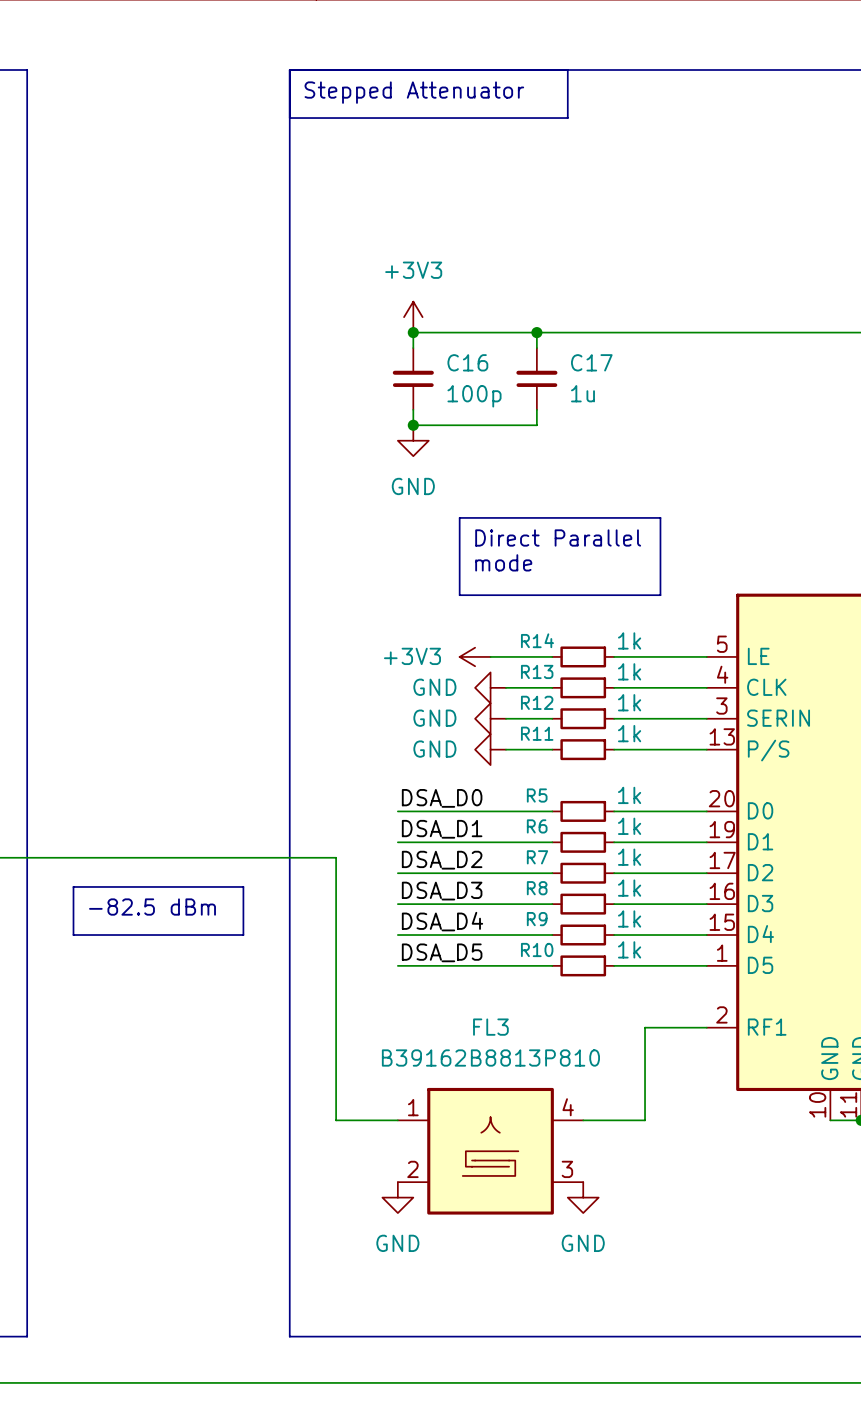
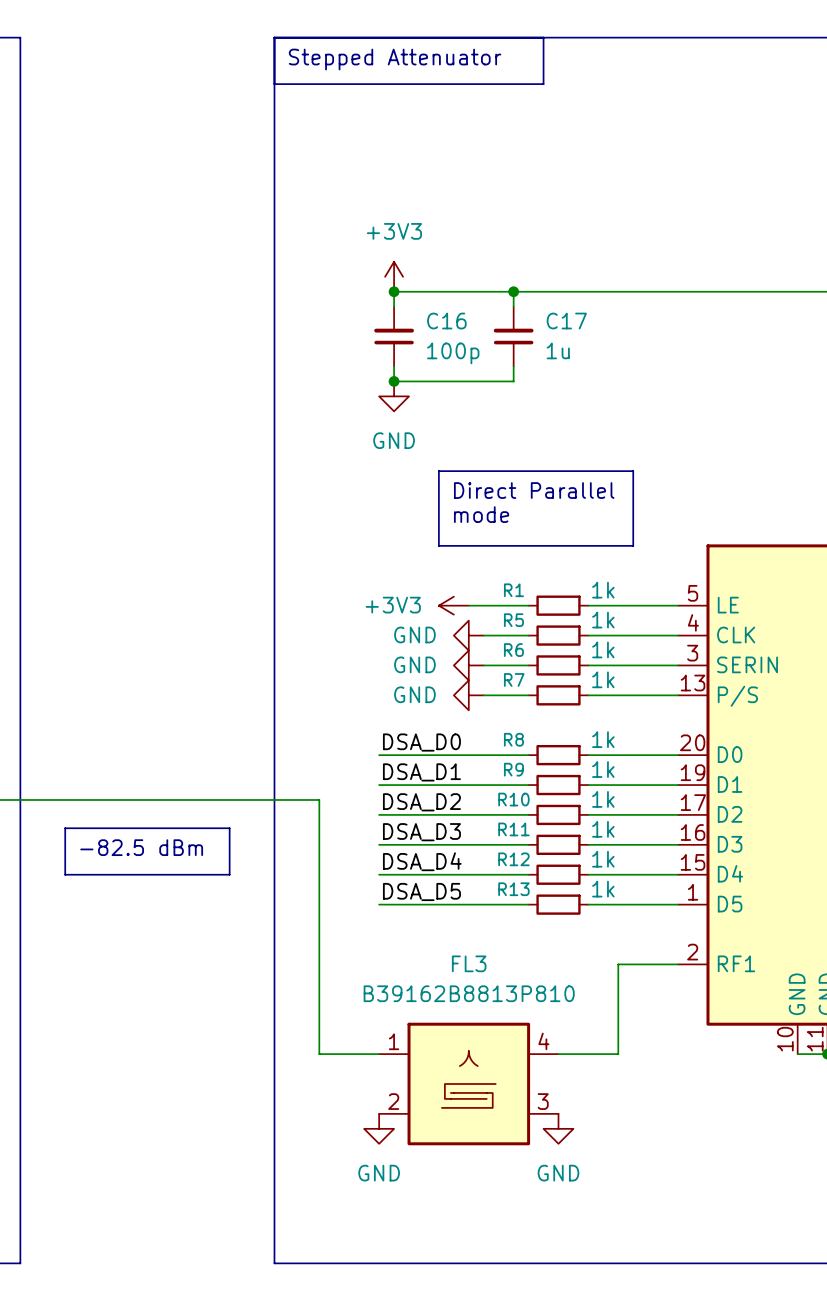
R14 name: R14 (537, 640) -> R1 (513, 590)
R13 name: R13 (537, 671) -> R5 (513, 620)
R12 name: R12 (537, 702) -> R6 (513, 650)
R11 name: R11 (537, 733) -> R7 (514, 679)
R5 name: R5 (537, 795) -> R8 (513, 739)
R6 name: R6 (537, 826) -> R9 (513, 769)
R7 name: R7 (537, 857) -> R10 (513, 799)
R8 name: R8 (537, 888) -> R11 (513, 829)
R9 name: R9 (537, 919) -> R12 (513, 859)
R10 name: R10 (537, 949) -> R13 (513, 889)

